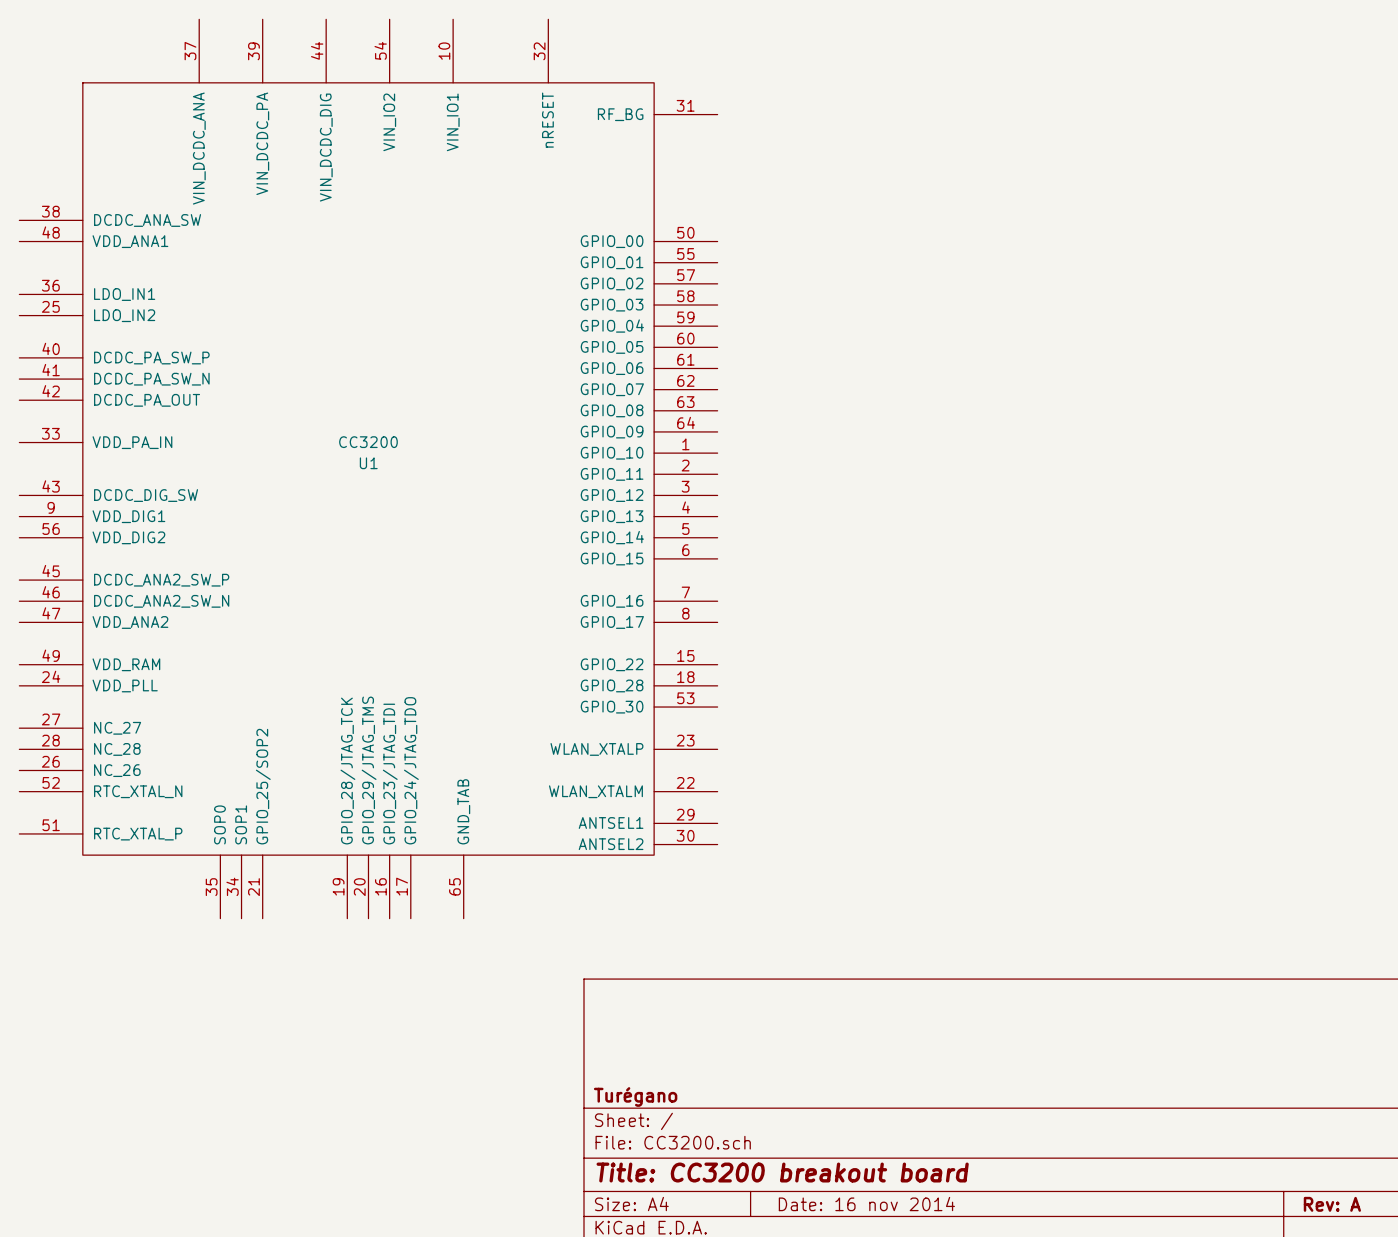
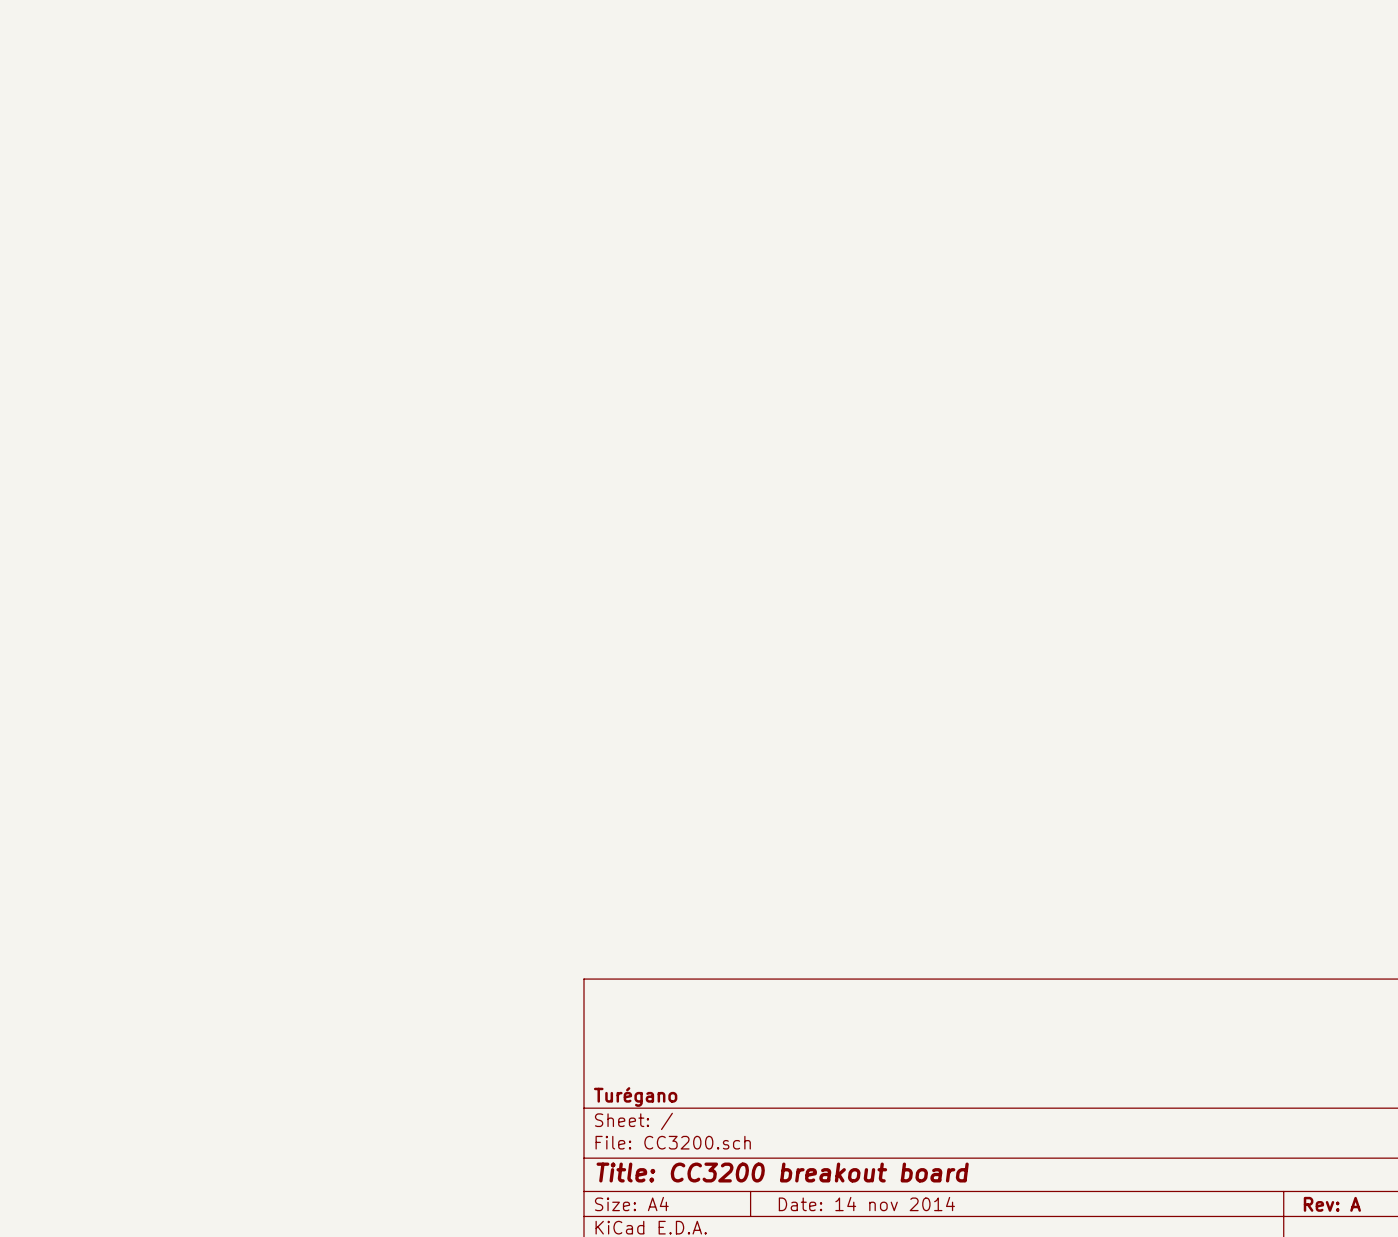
U1: CC3200 (368, 468) -> none
title block: Date: 16 nov 2014 (866, 1204) -> Date: 14 nov 2014 (866, 1204)

